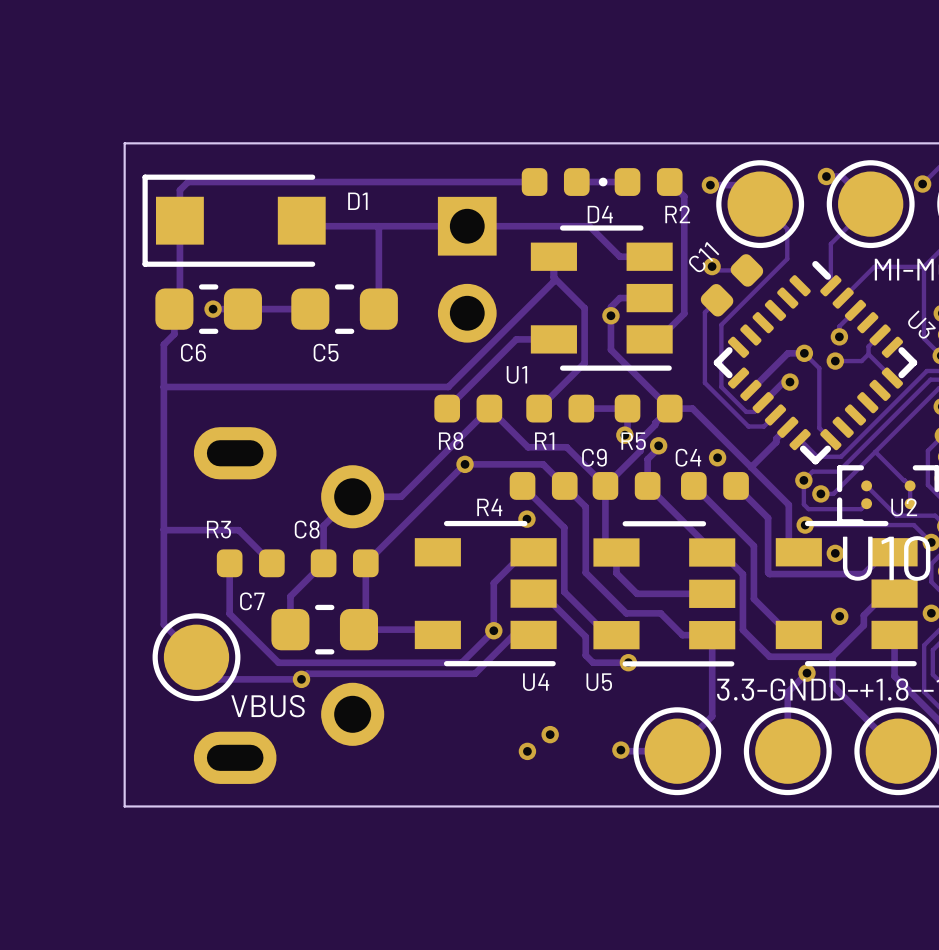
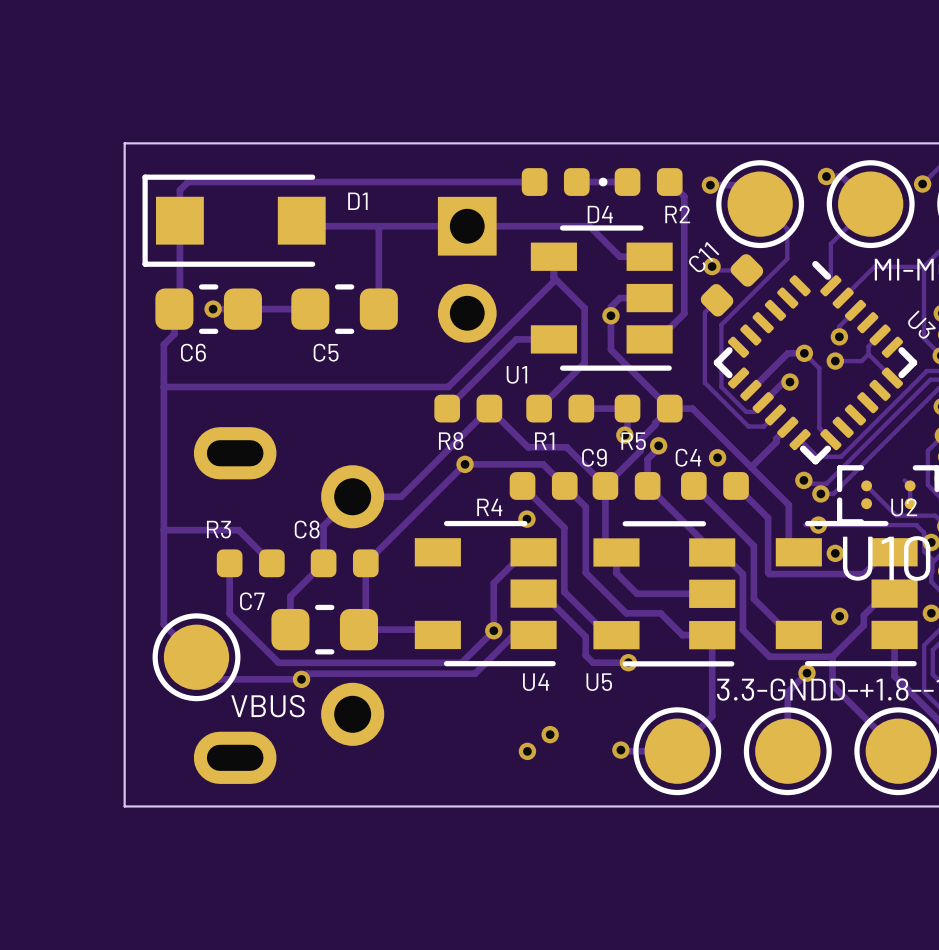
track: (875, 451) (903, 480) -> none
track: (838, 471) (812, 471) (803, 480) (803, 504) (808, 509) (861, 509) (866, 503) -> (838, 471) (826, 483) (807, 483)
via position: (805, 525) -> (818, 525)
track: (913, 525) (931, 542) -> (913, 525) (924, 532) (924, 551) (932, 559) (932, 572)

